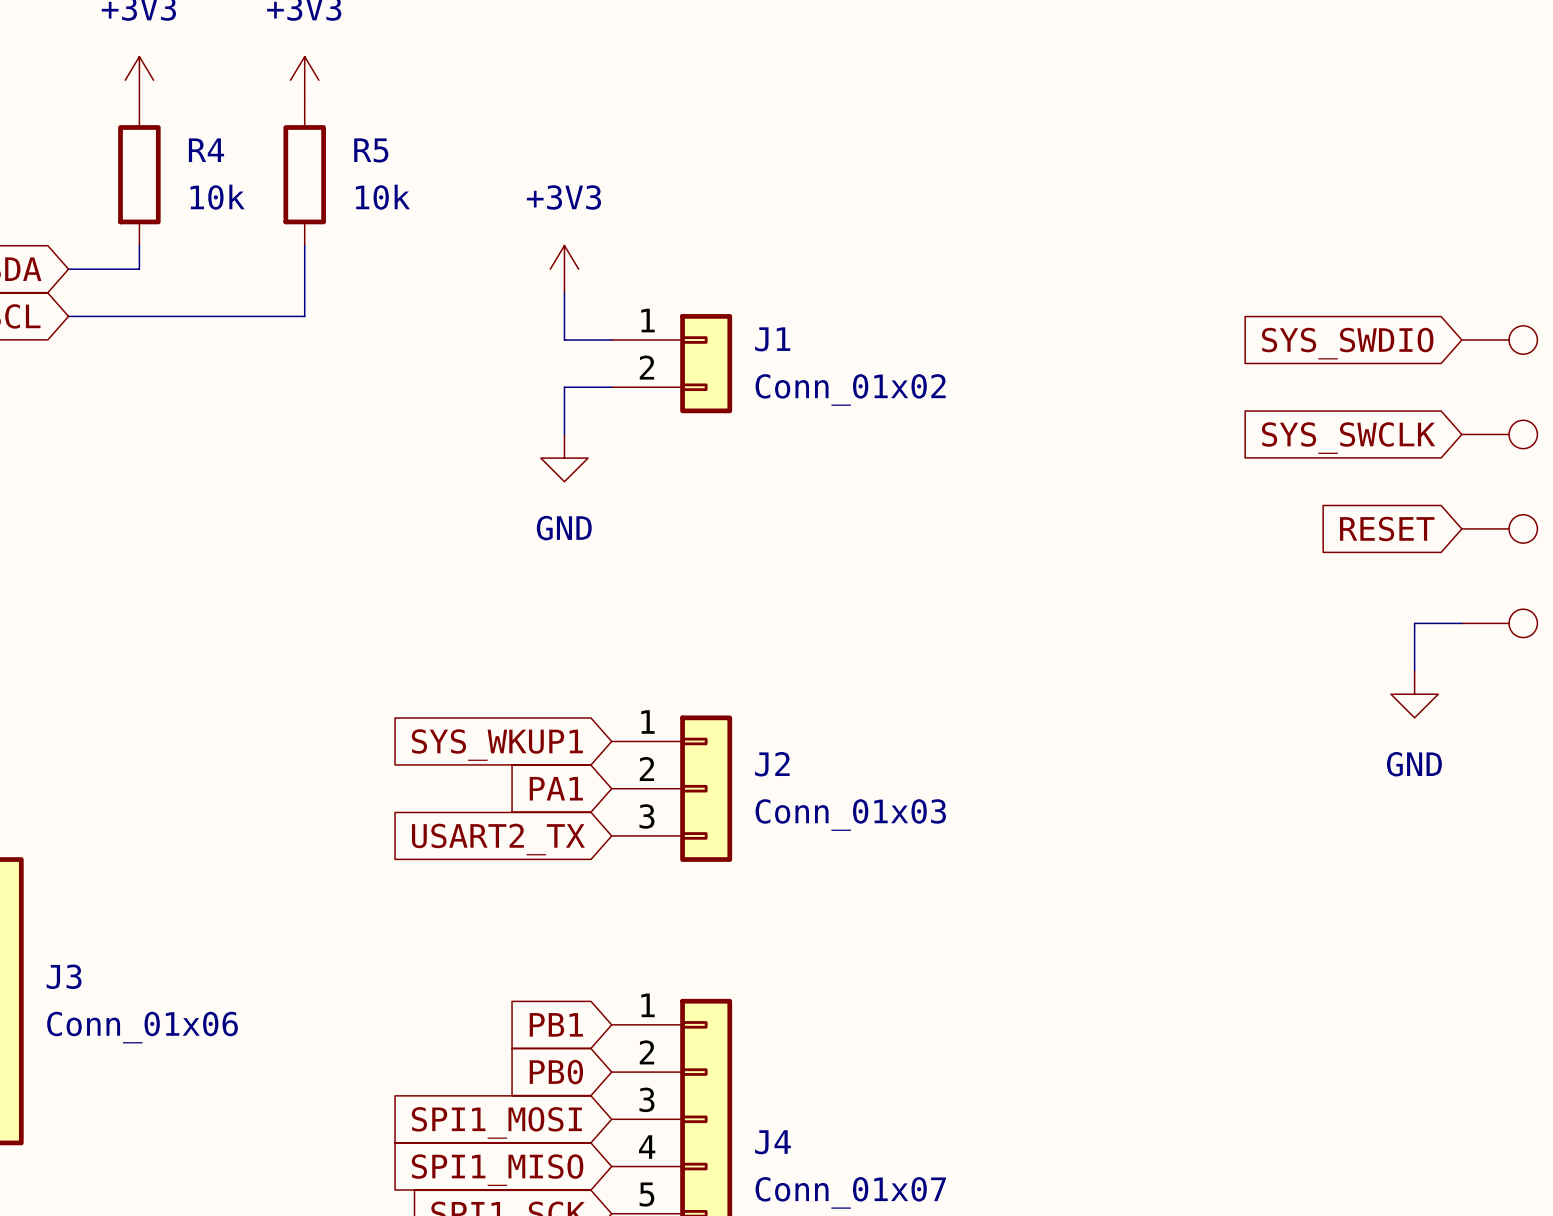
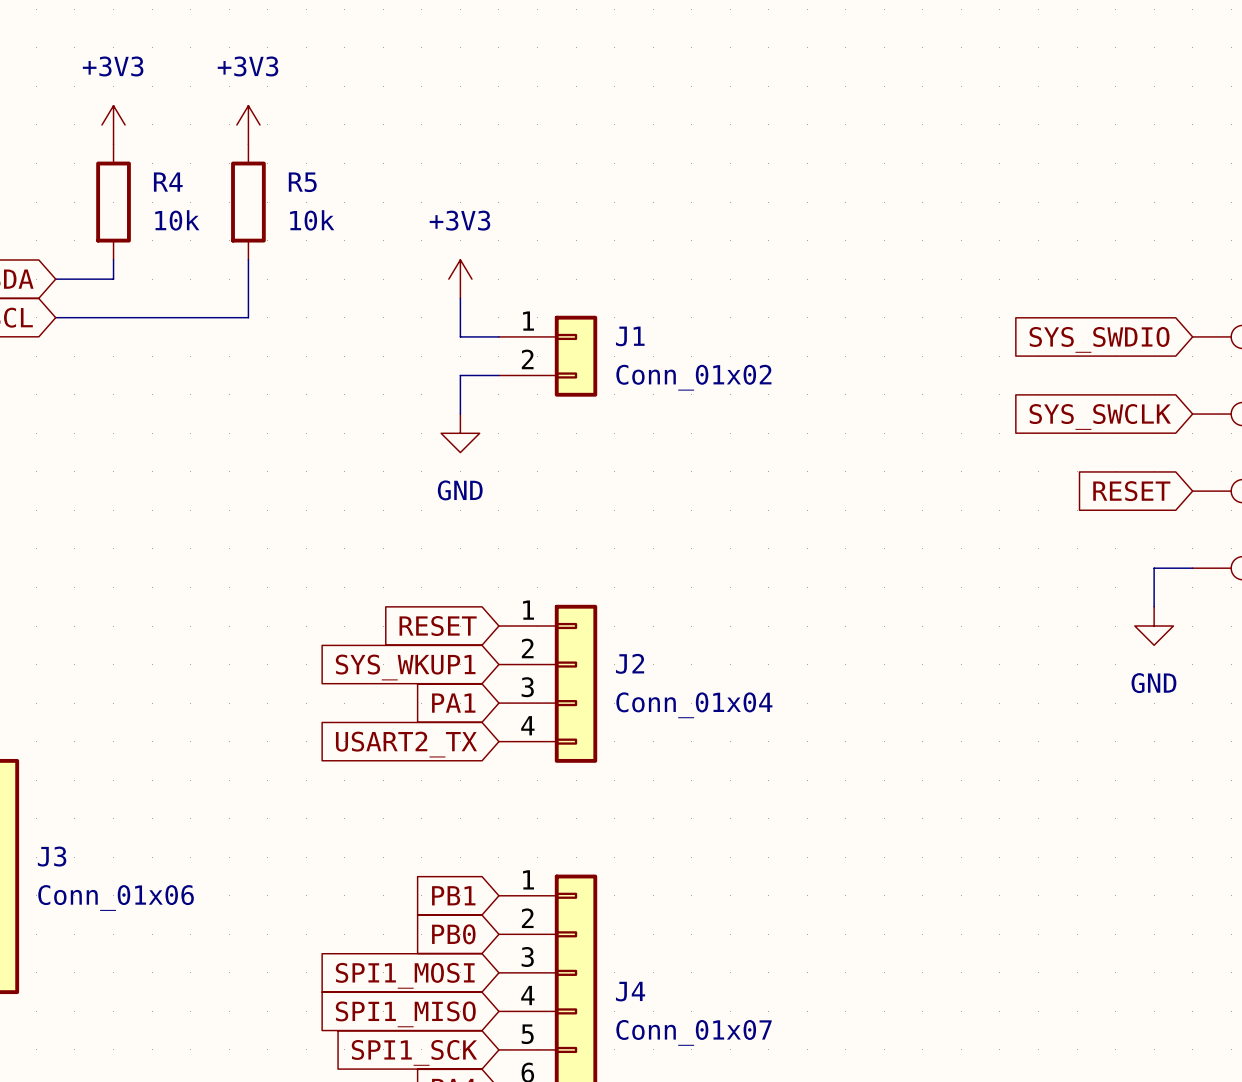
global label: none -> RESET (438, 626)
J2 symbol: [611, 715, 733, 862] -> [498, 604, 598, 763]
J2 value: Conn_01x03 (850, 815) -> Conn_01x04 (694, 705)

